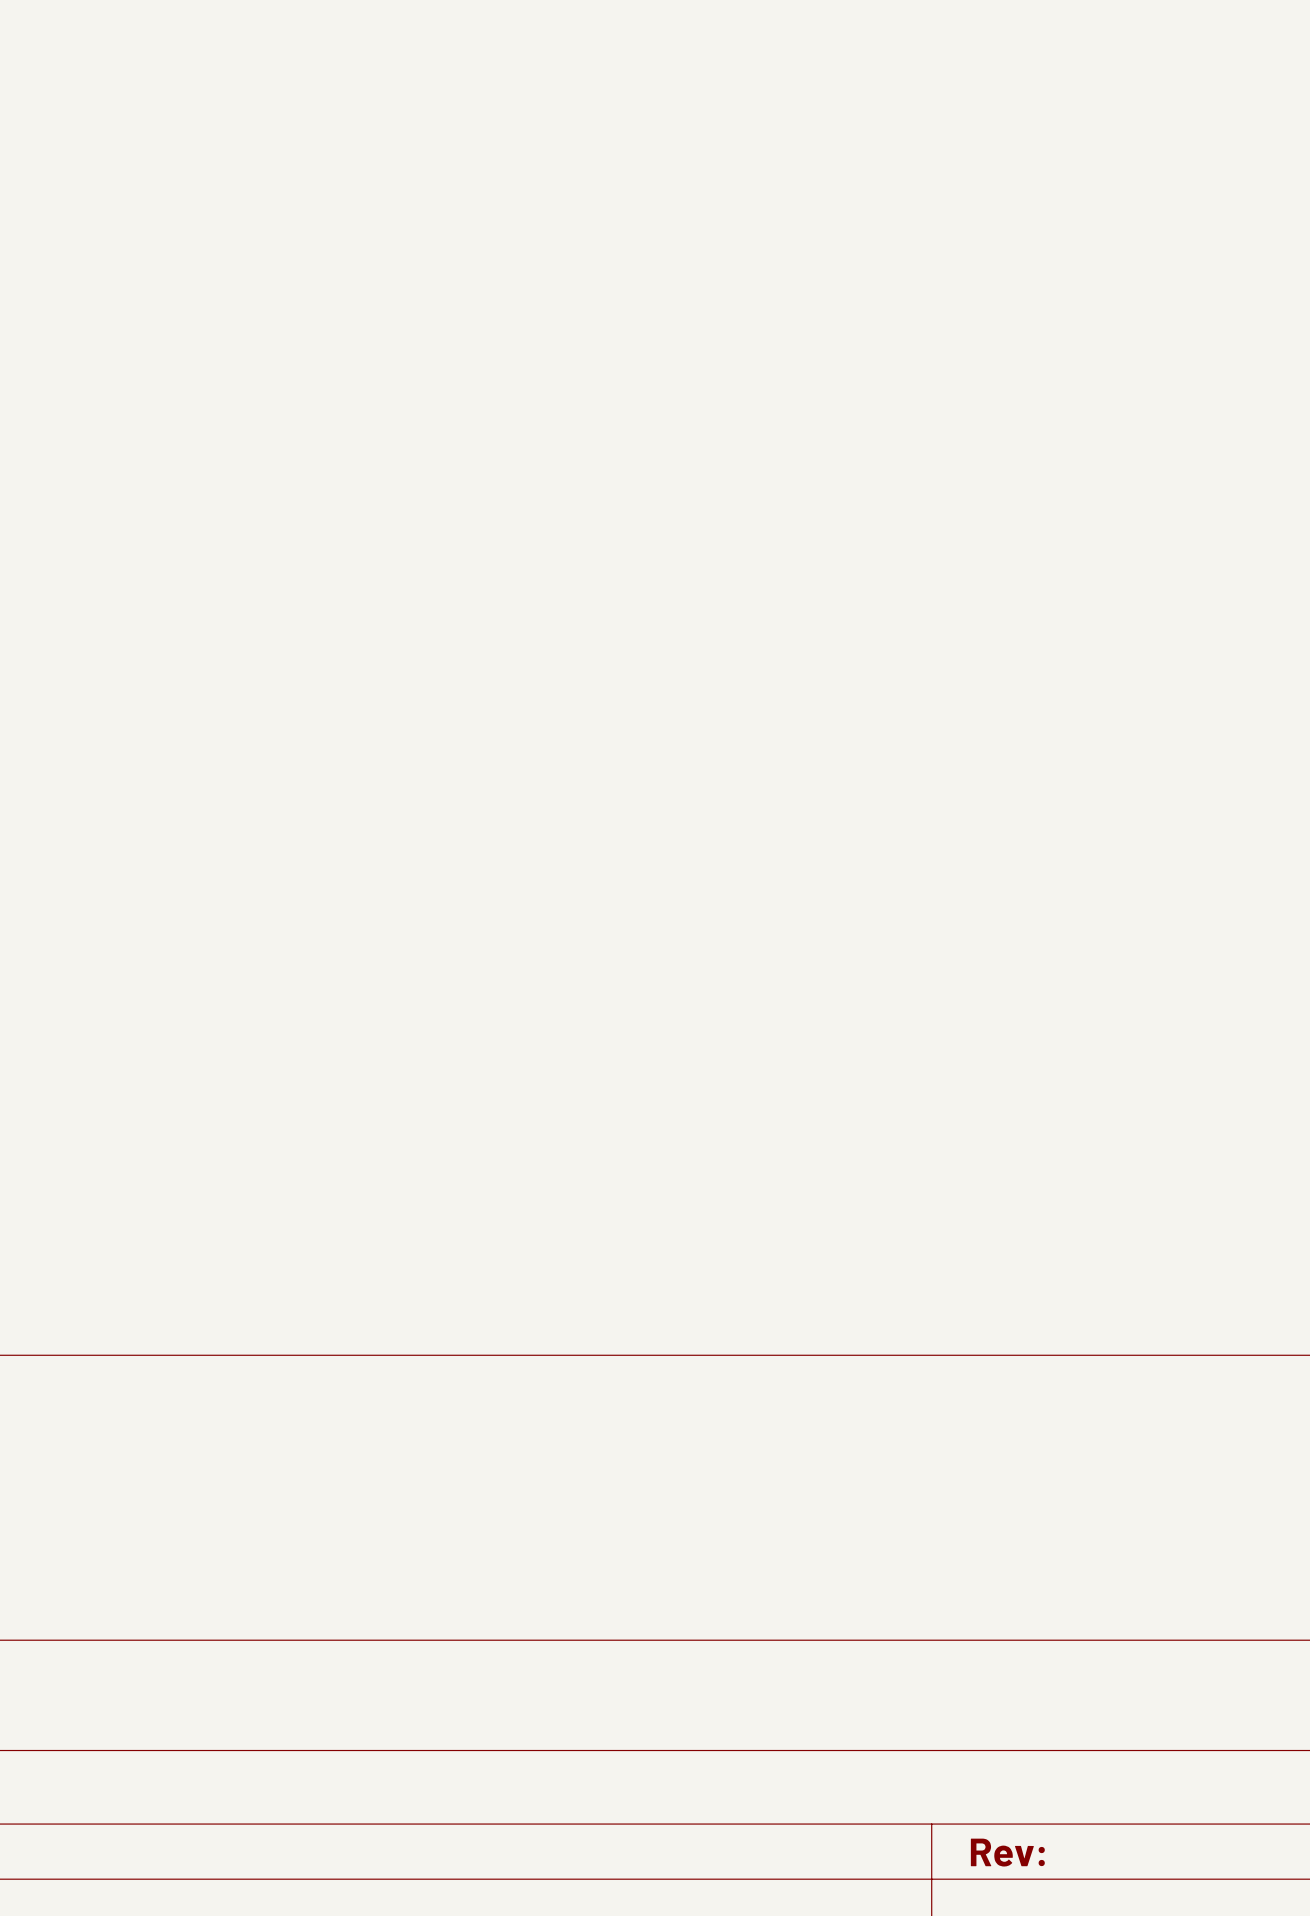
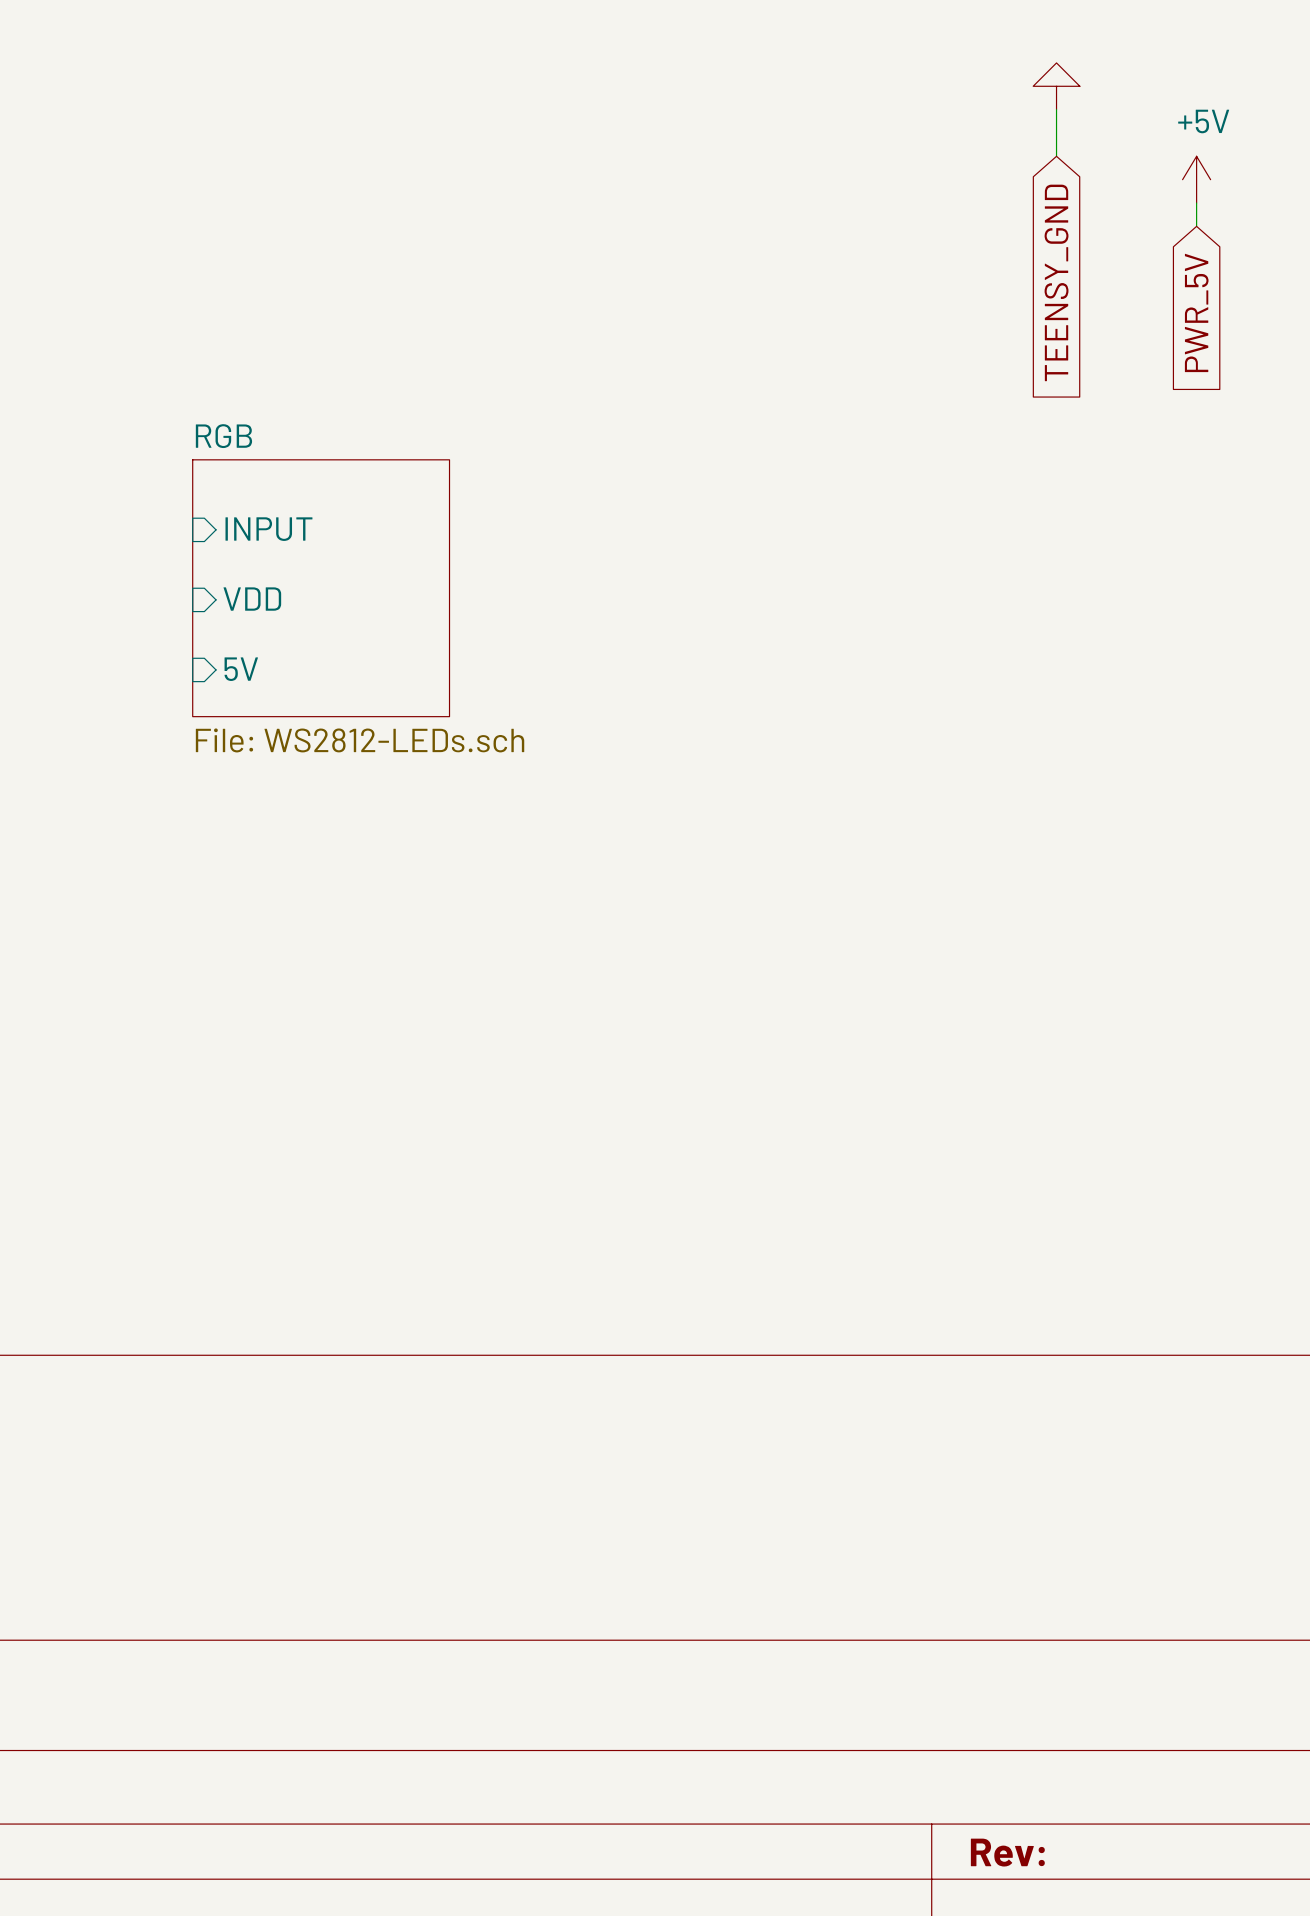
power symbol: none -> (1056, 86)
wire: none -> (1056, 109) (1056, 156)
power symbol: none -> +5V (1196, 179)
wire: none -> (1196, 203) (1196, 226)
global label: none -> TEENSY_GND (1056, 282)
global label: none -> PWR_5V (1196, 312)
sheet pin: none -> INPUT (268, 529)
sheet RGB: none -> File: WS2812-LEDs.sch (321, 588)
sheet pin: none -> VDD (252, 599)
sheet pin: none -> 5V (241, 669)

